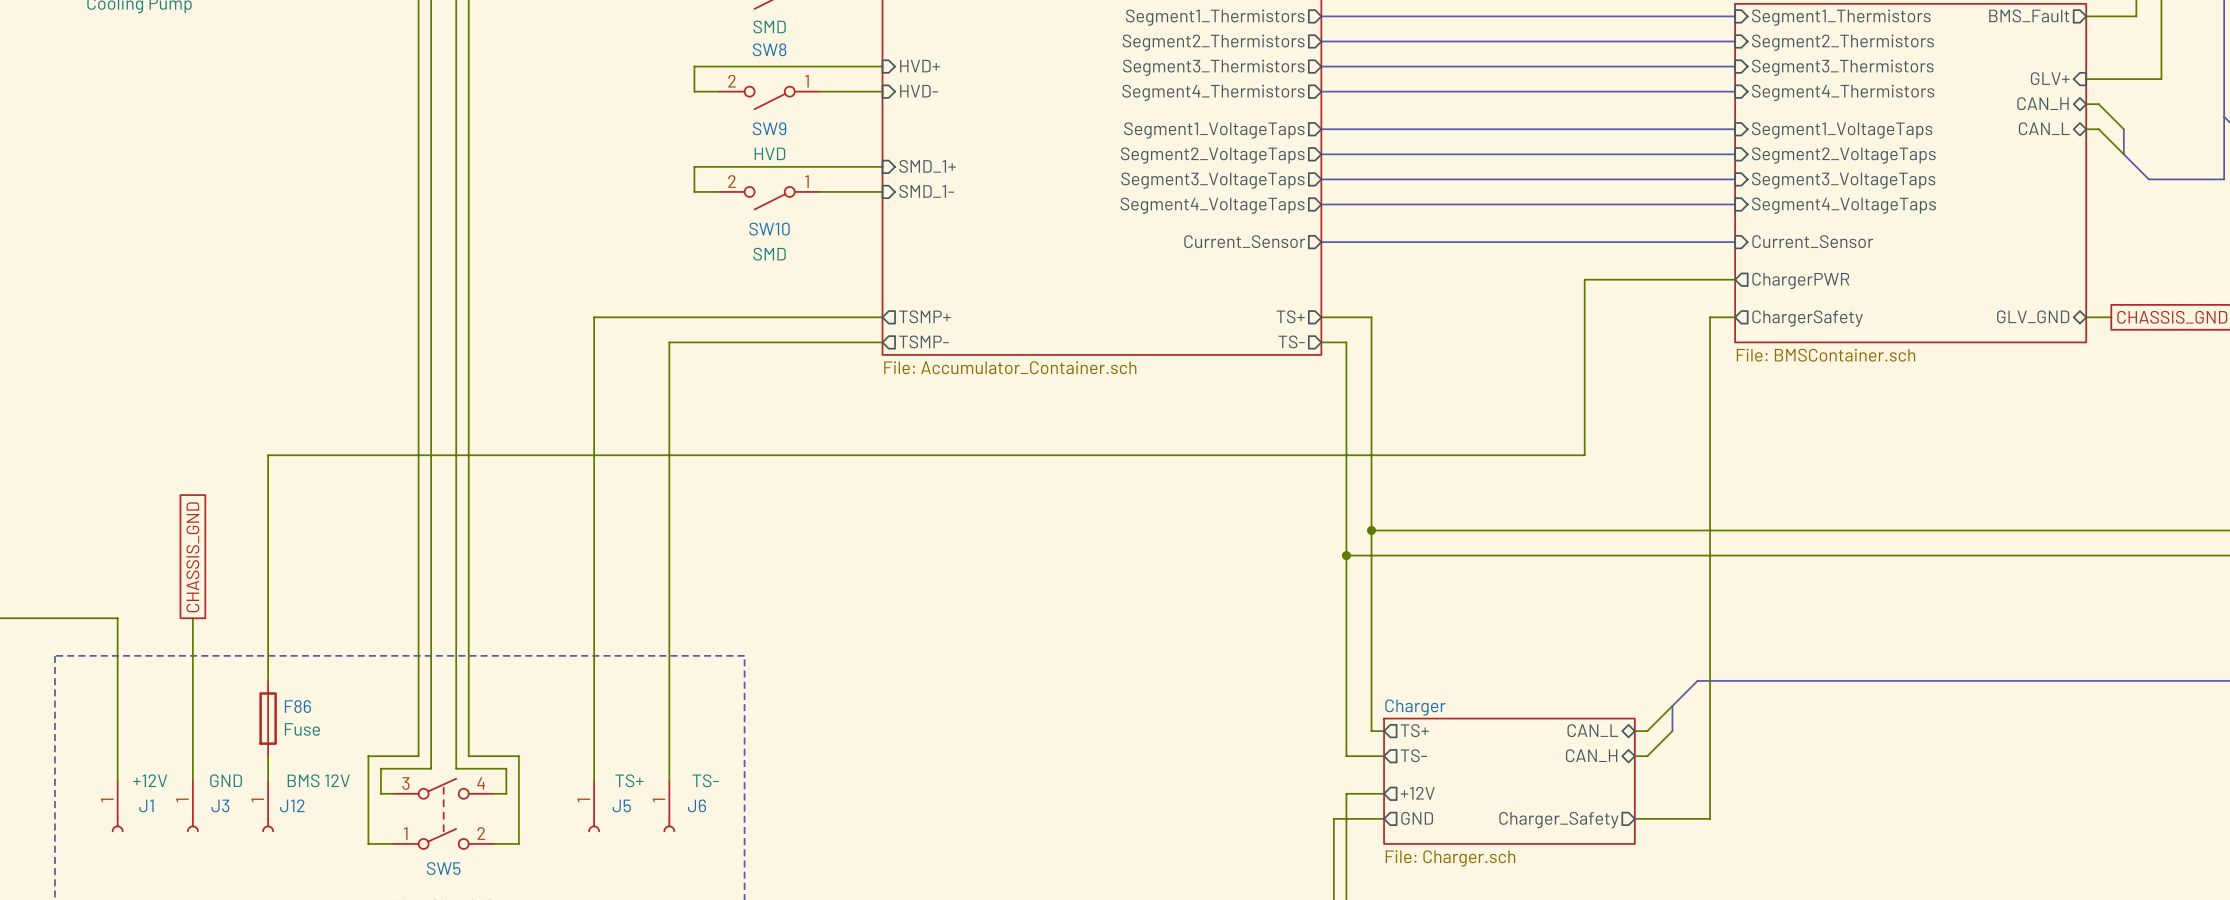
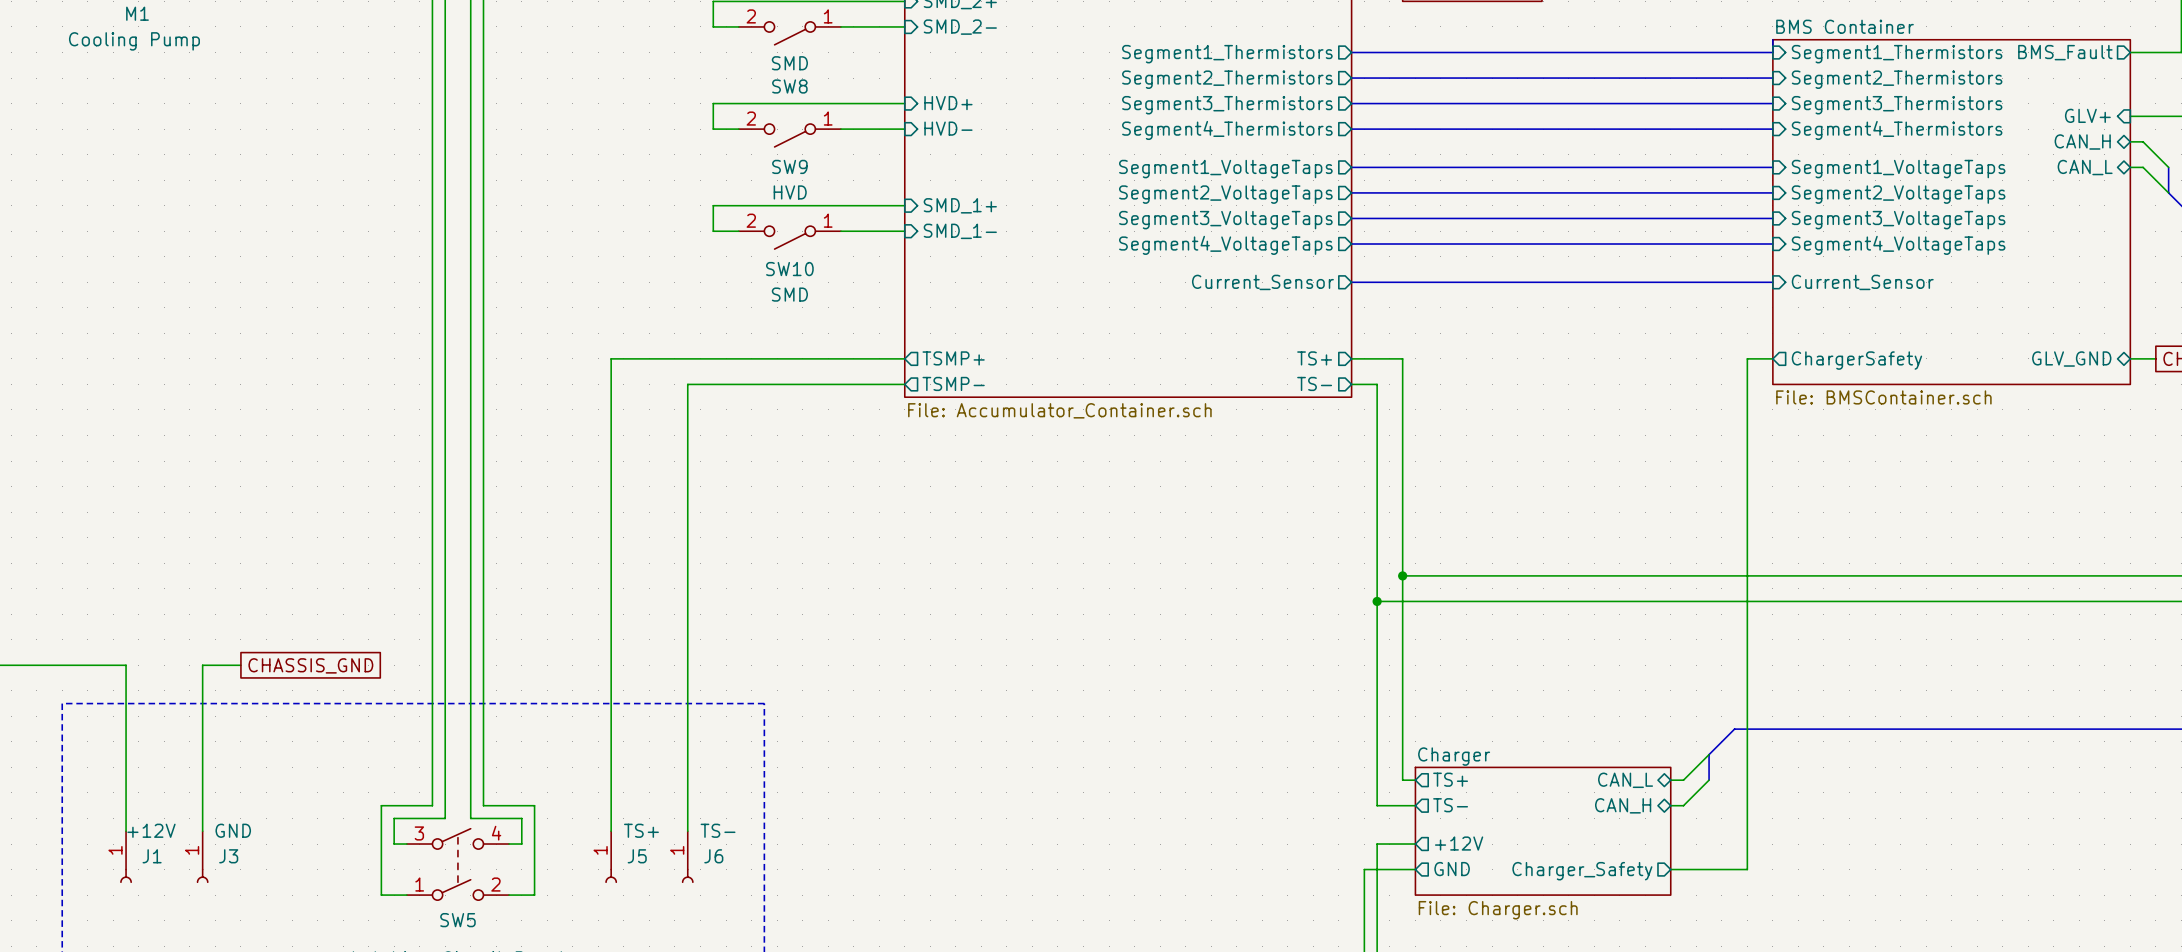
wire: (1735, 279) (1584, 279) (1584, 455) (268, 455) (268, 680) -> none
sheet pin: ChargerPWR (1800, 280) -> none
global label rotation: 0° (192, 557) -> 90° clockwise (310, 665)
wire: none -> (202, 665) (240, 665)
F86: Fuse (268, 718) -> none
wire: (268, 756) (268, 781) -> none
J12: BMS 12V (268, 806) -> none

